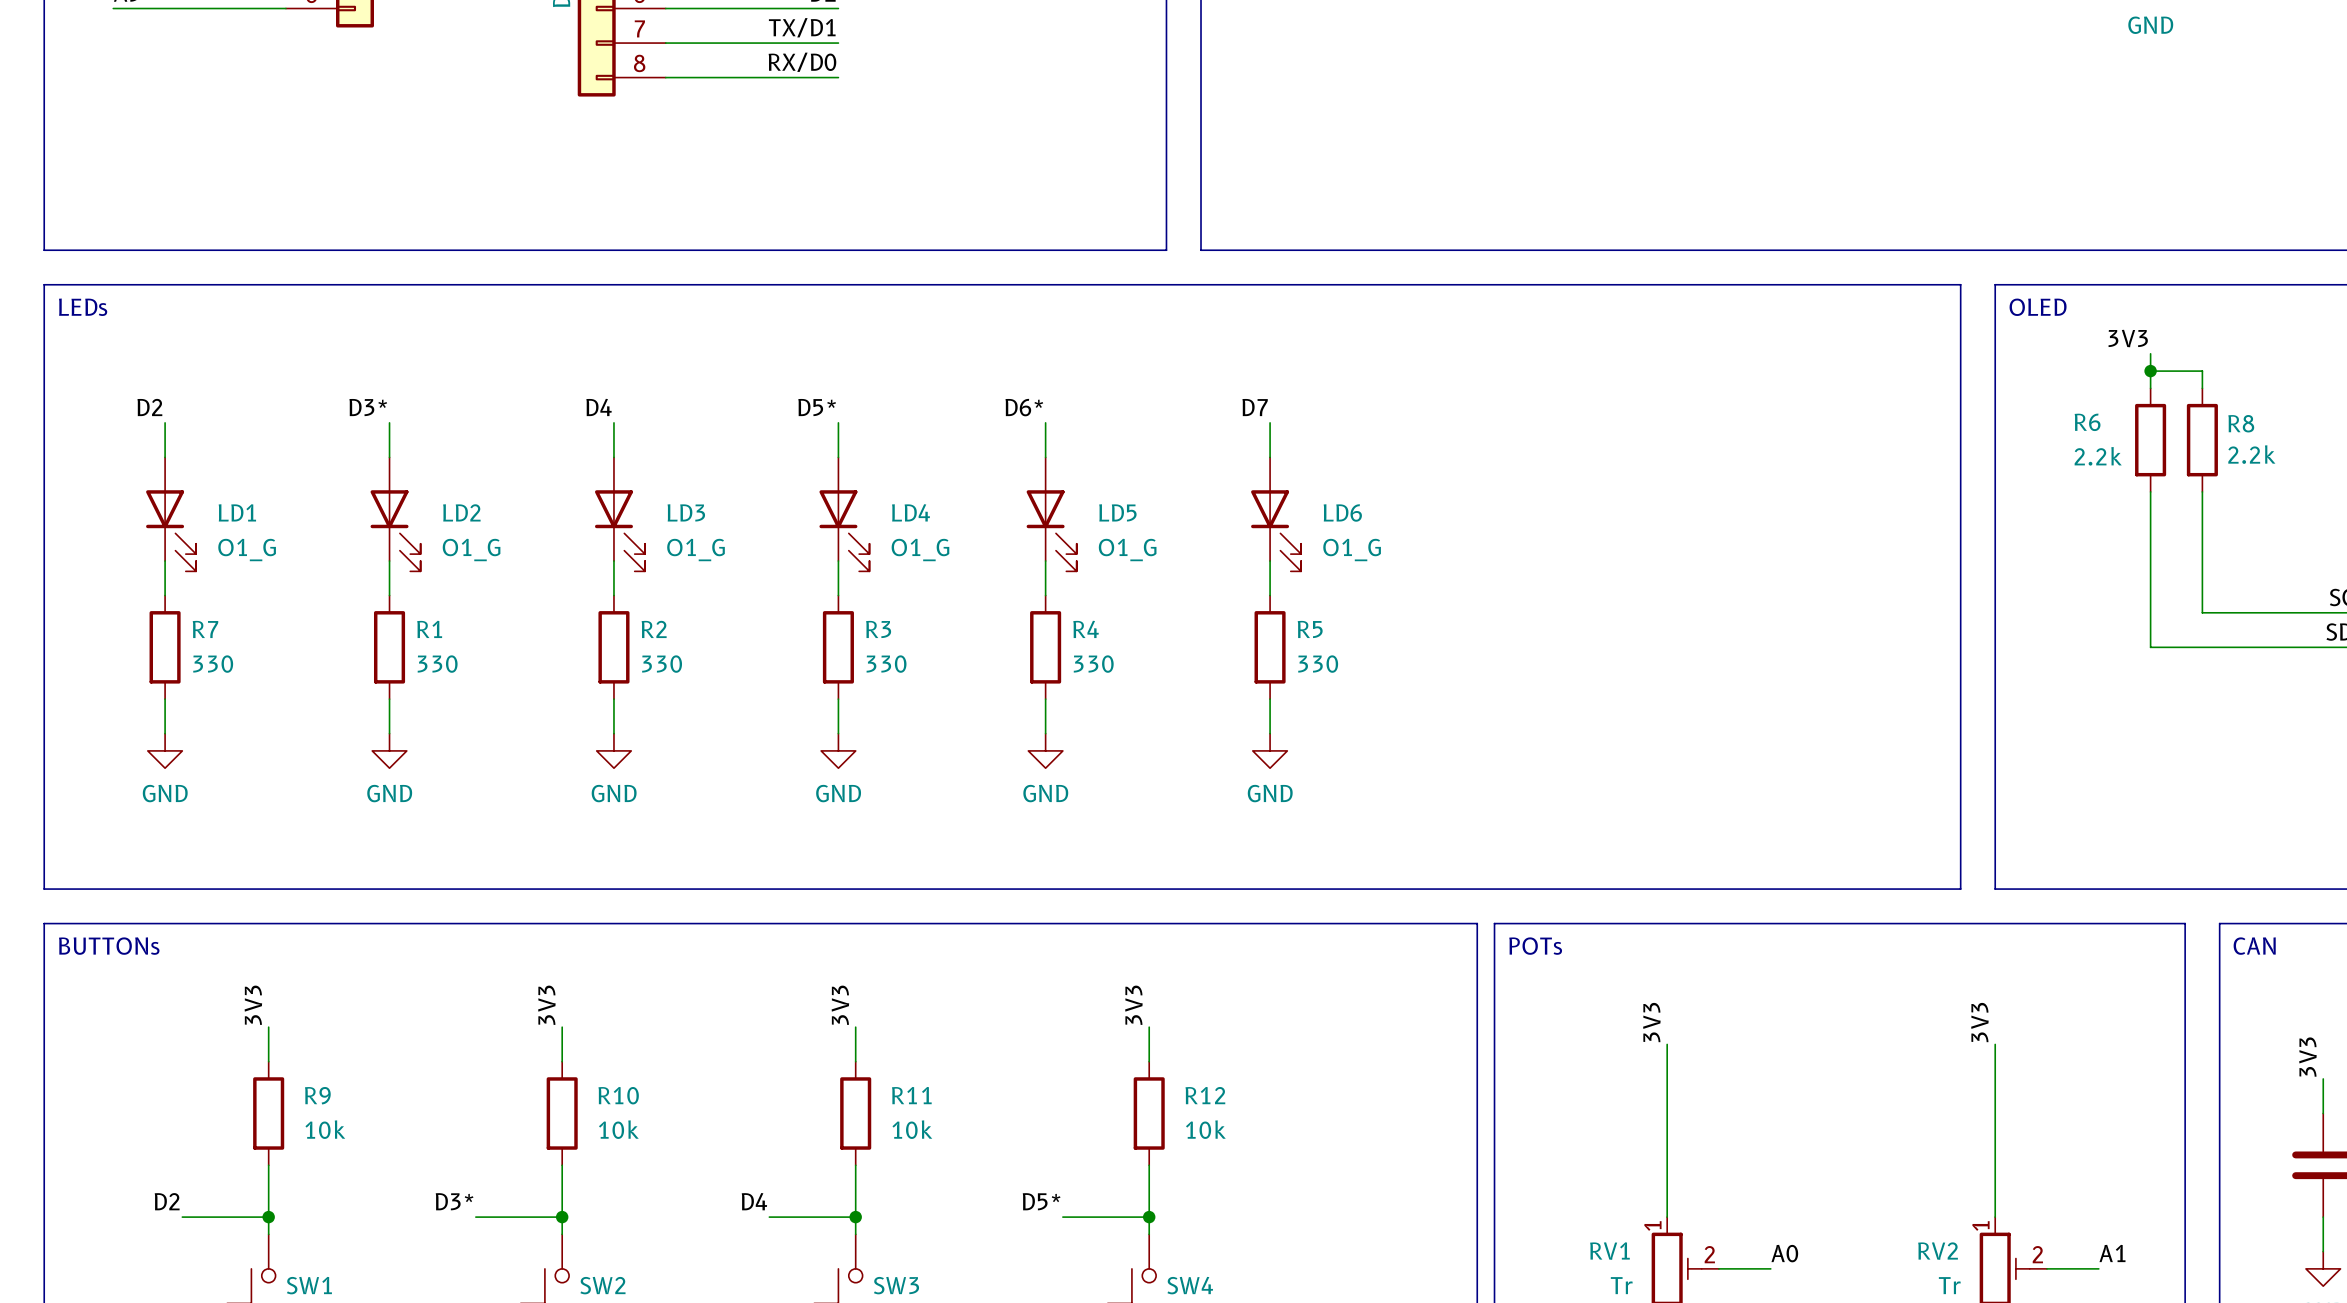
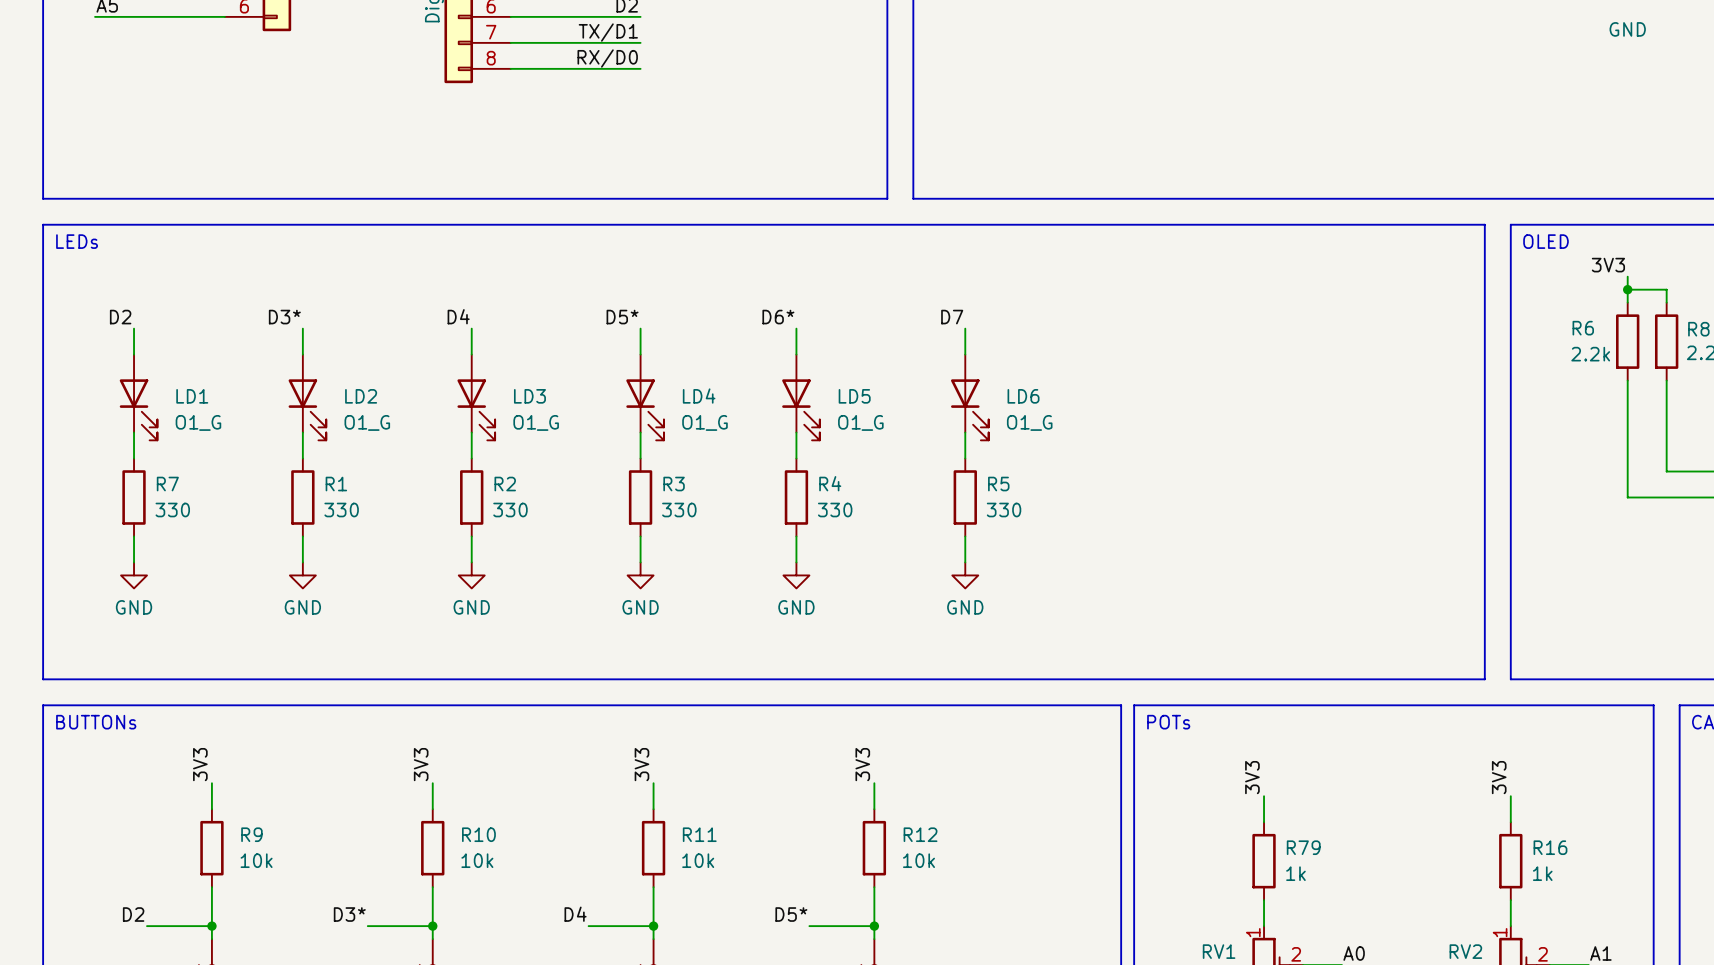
wire: (1667, 1078) (1667, 1182) -> none
wire: (1995, 1078) (1995, 1182) -> none
R79: none -> 1k (1264, 861)
R16: none -> 1k (1510, 861)

